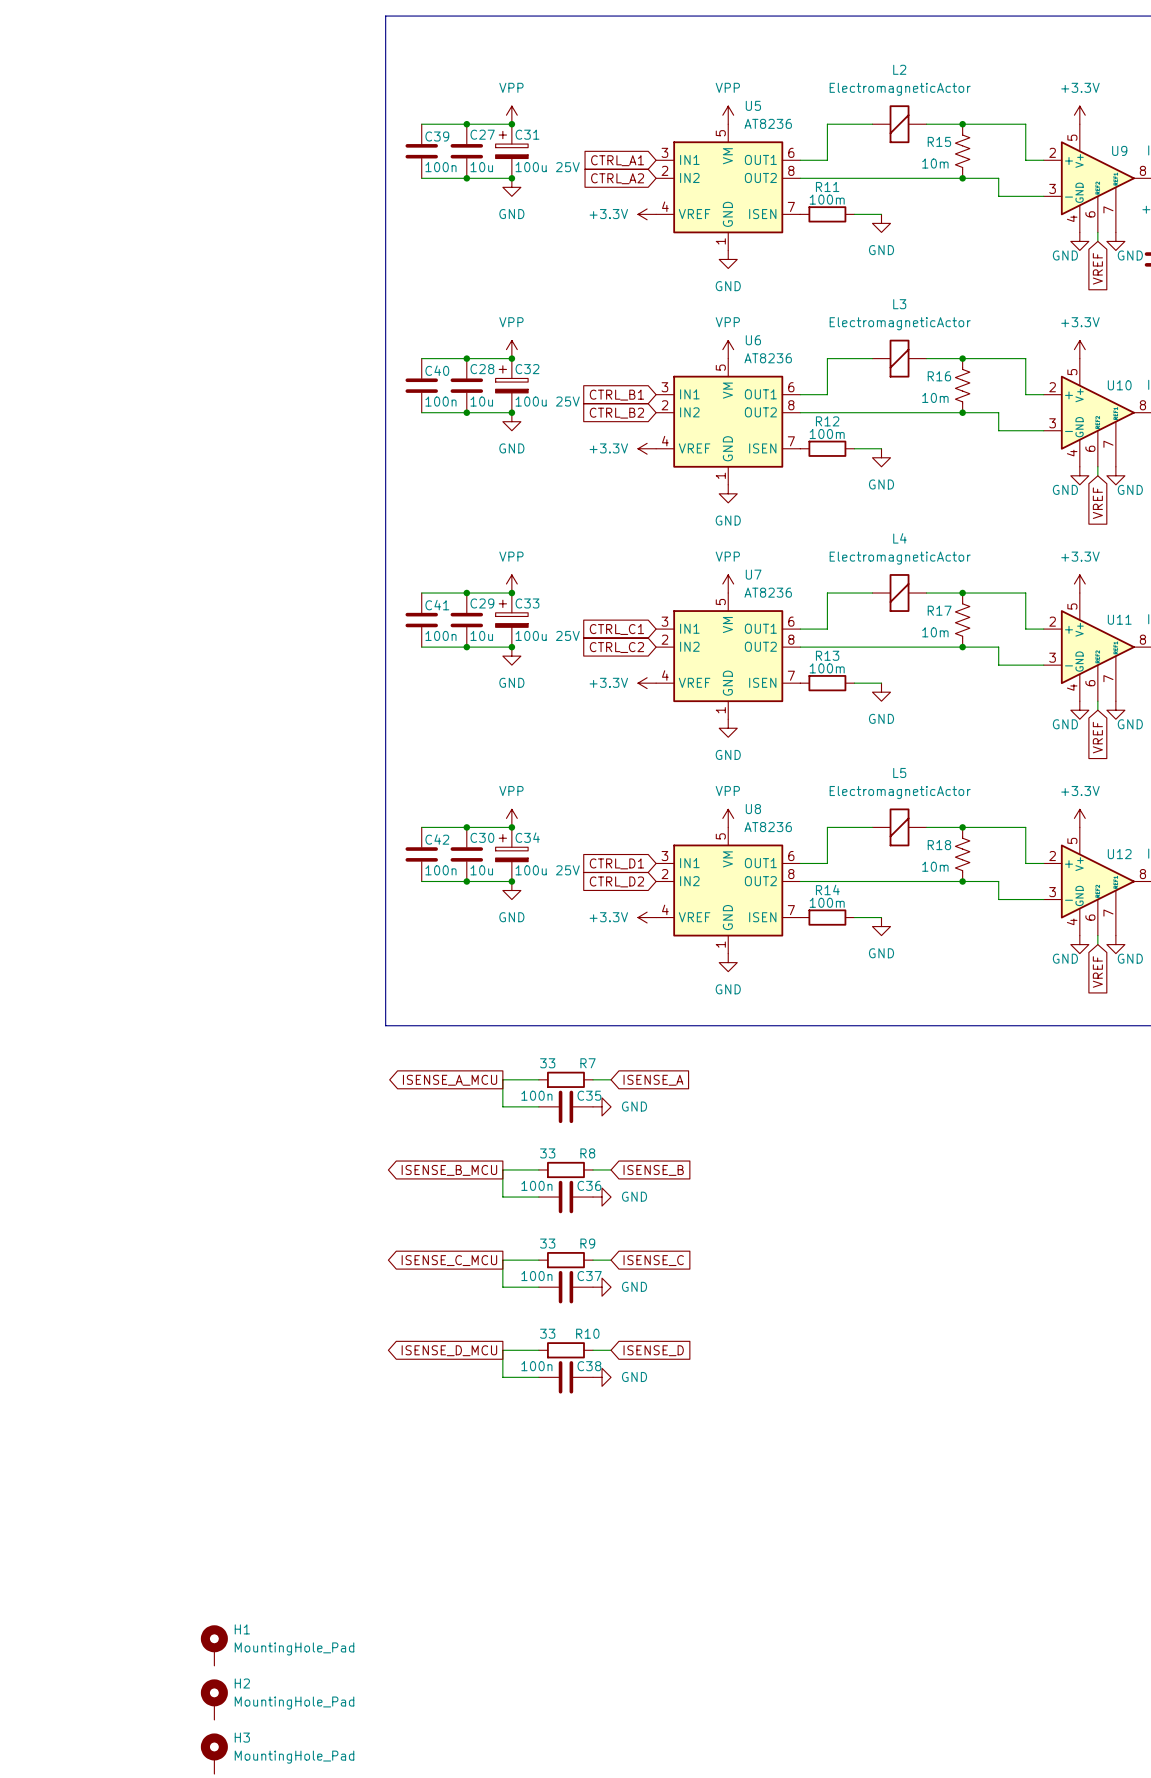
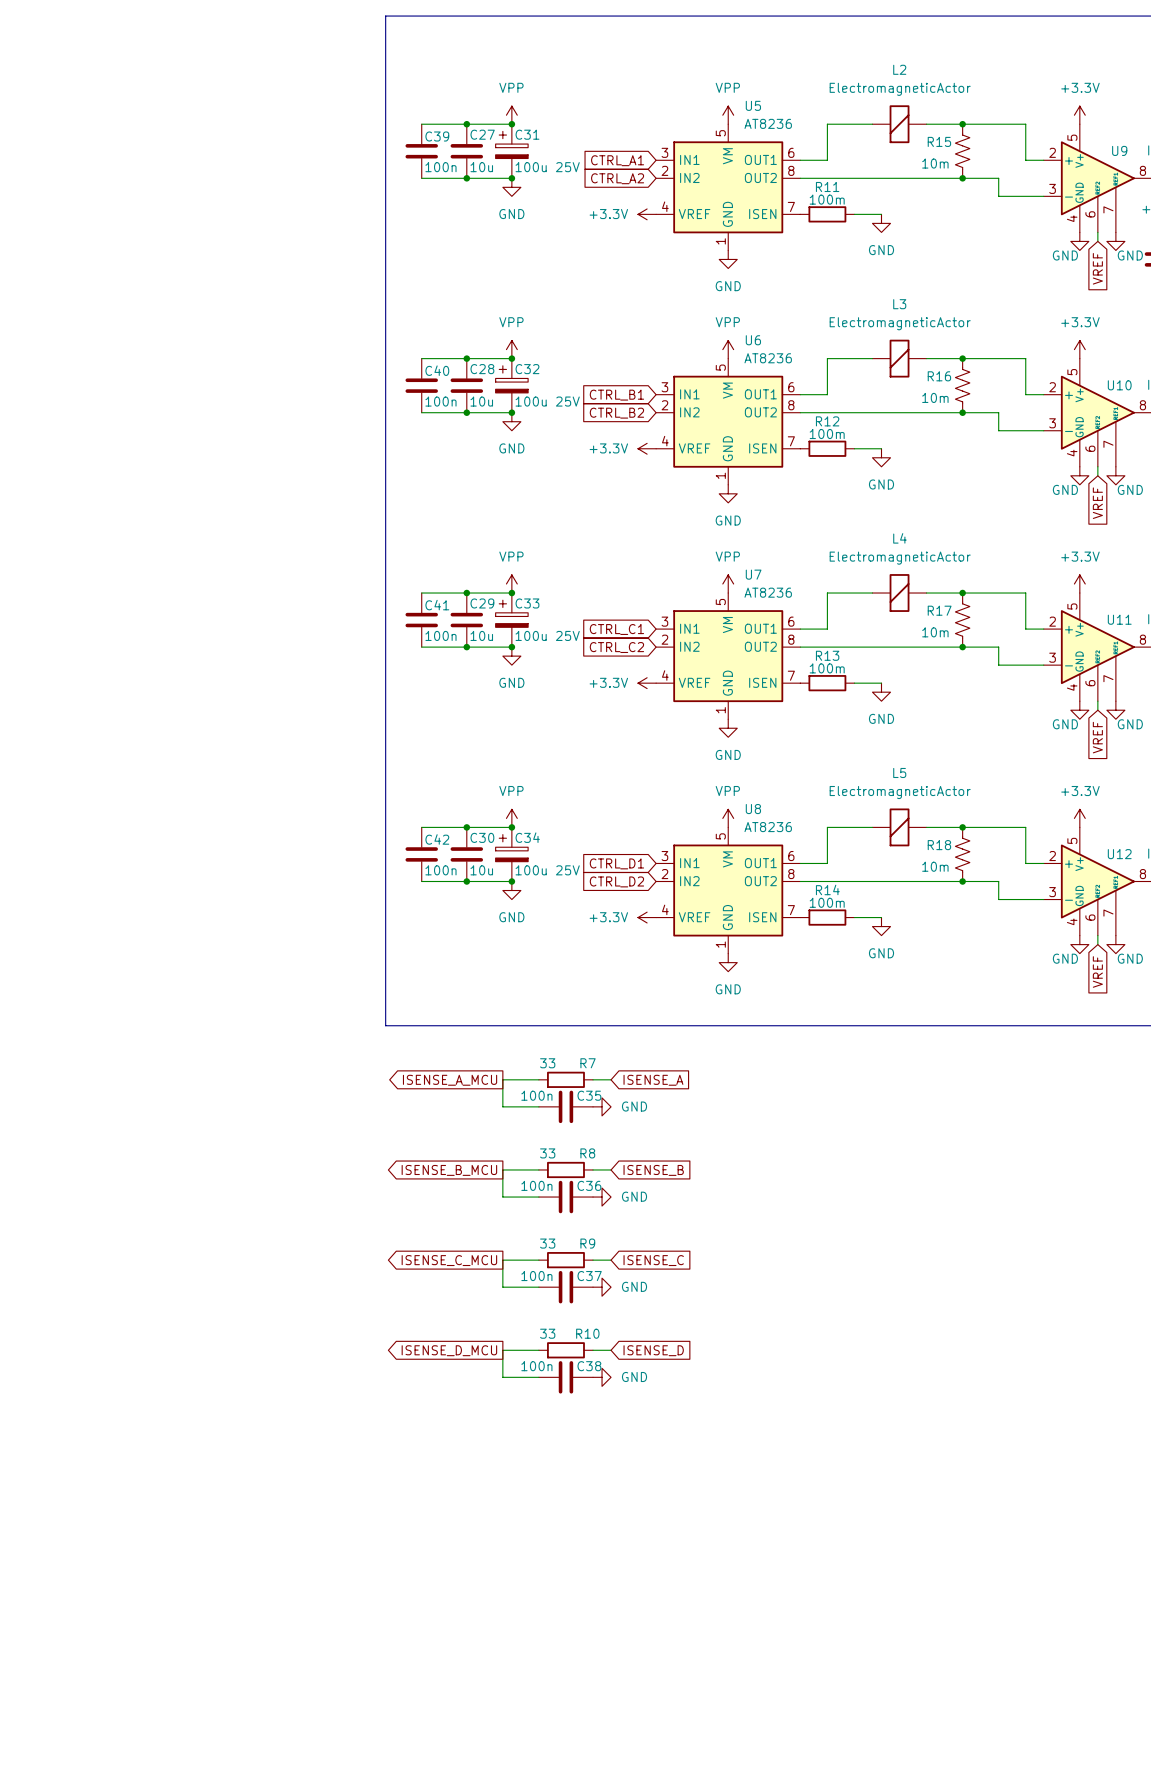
H1: MountingHole_Pad (214, 1645) -> none
H2: MountingHole_Pad (214, 1699) -> none
H3: MountingHole_Pad (214, 1753) -> none

